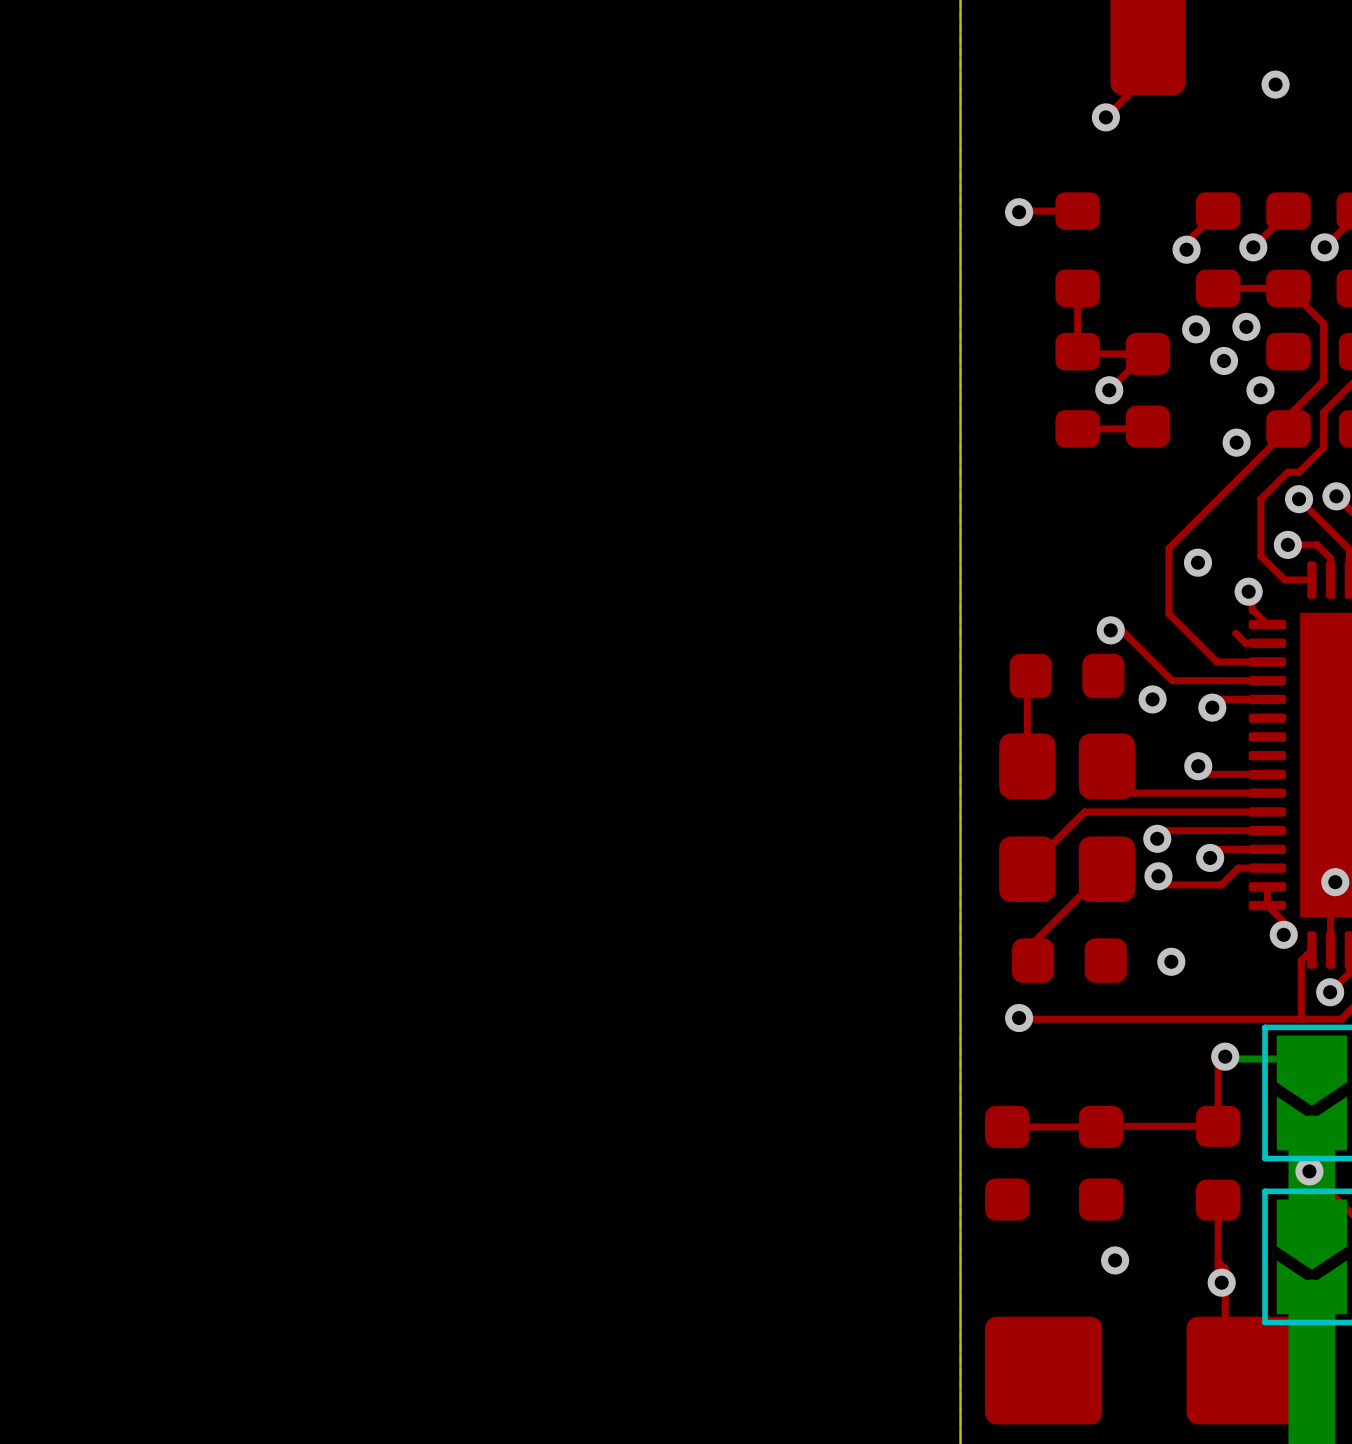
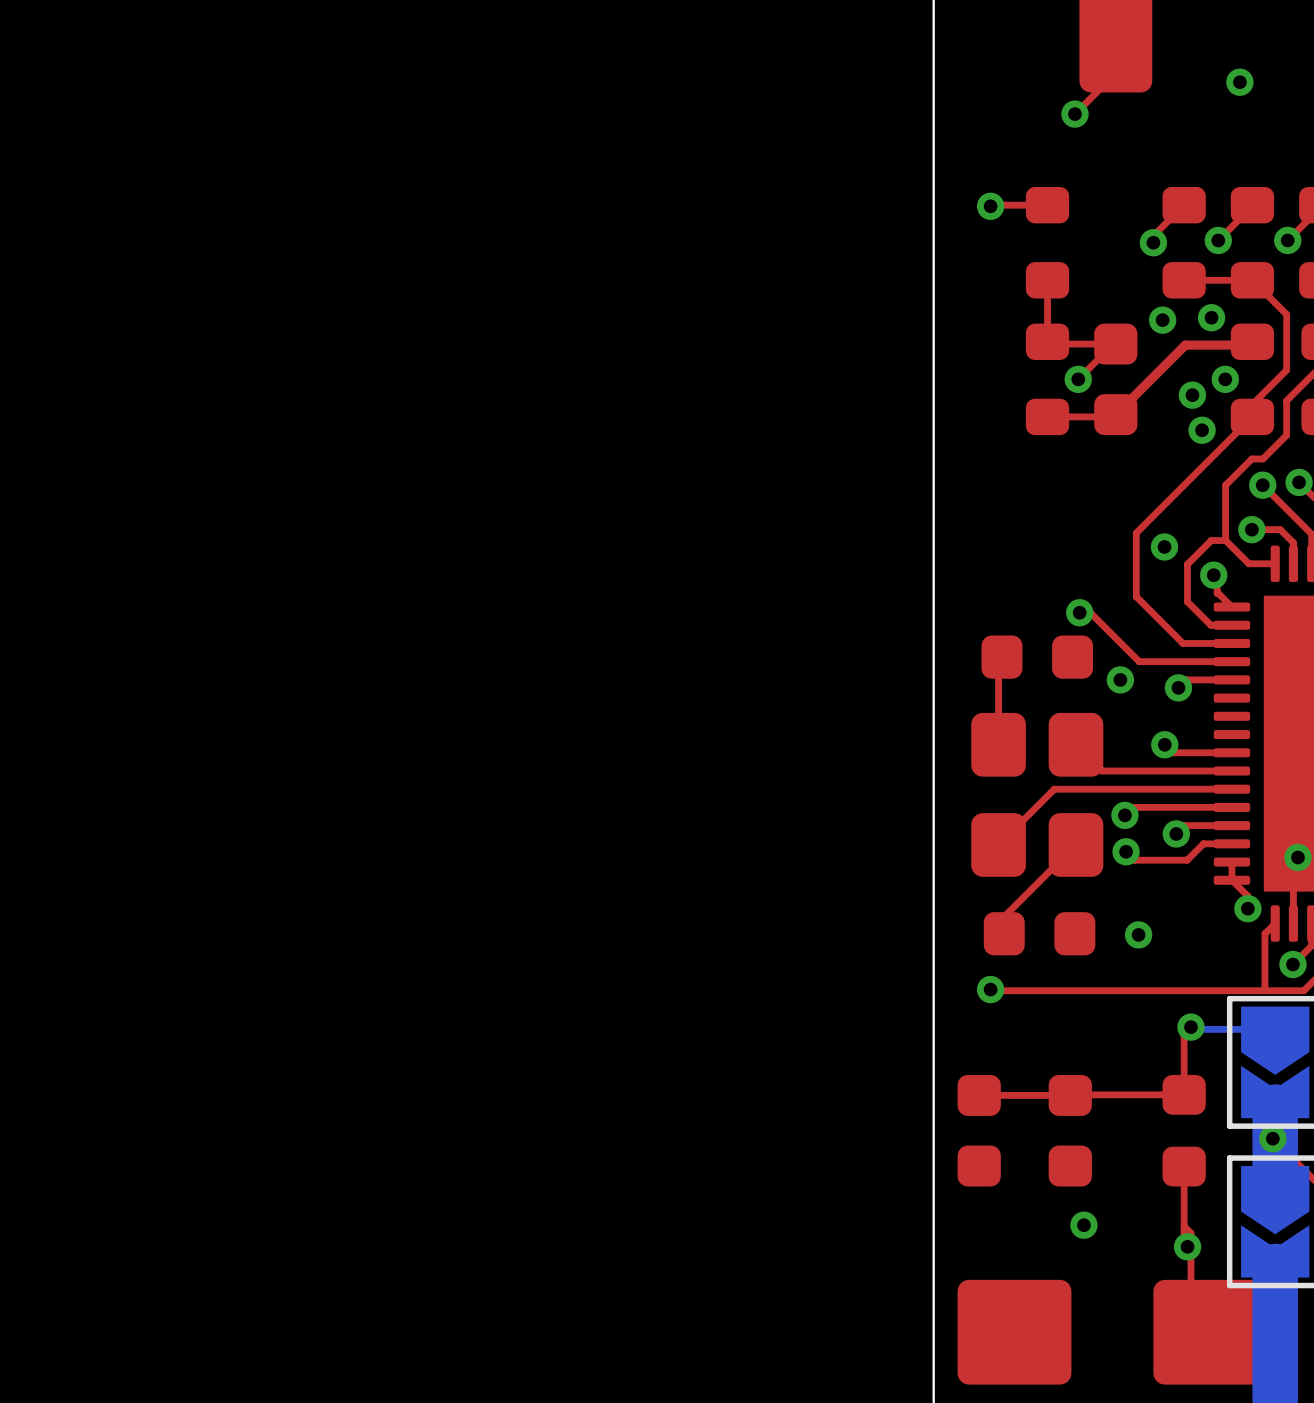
top track: none -> (1252, 341) (1249, 345) (1185, 345) (1115, 414)
via position: (1224, 360) -> (1192, 395)
top track: none -> (1225, 540) (1211, 540) (1187, 564) (1187, 601) (1201, 615)

